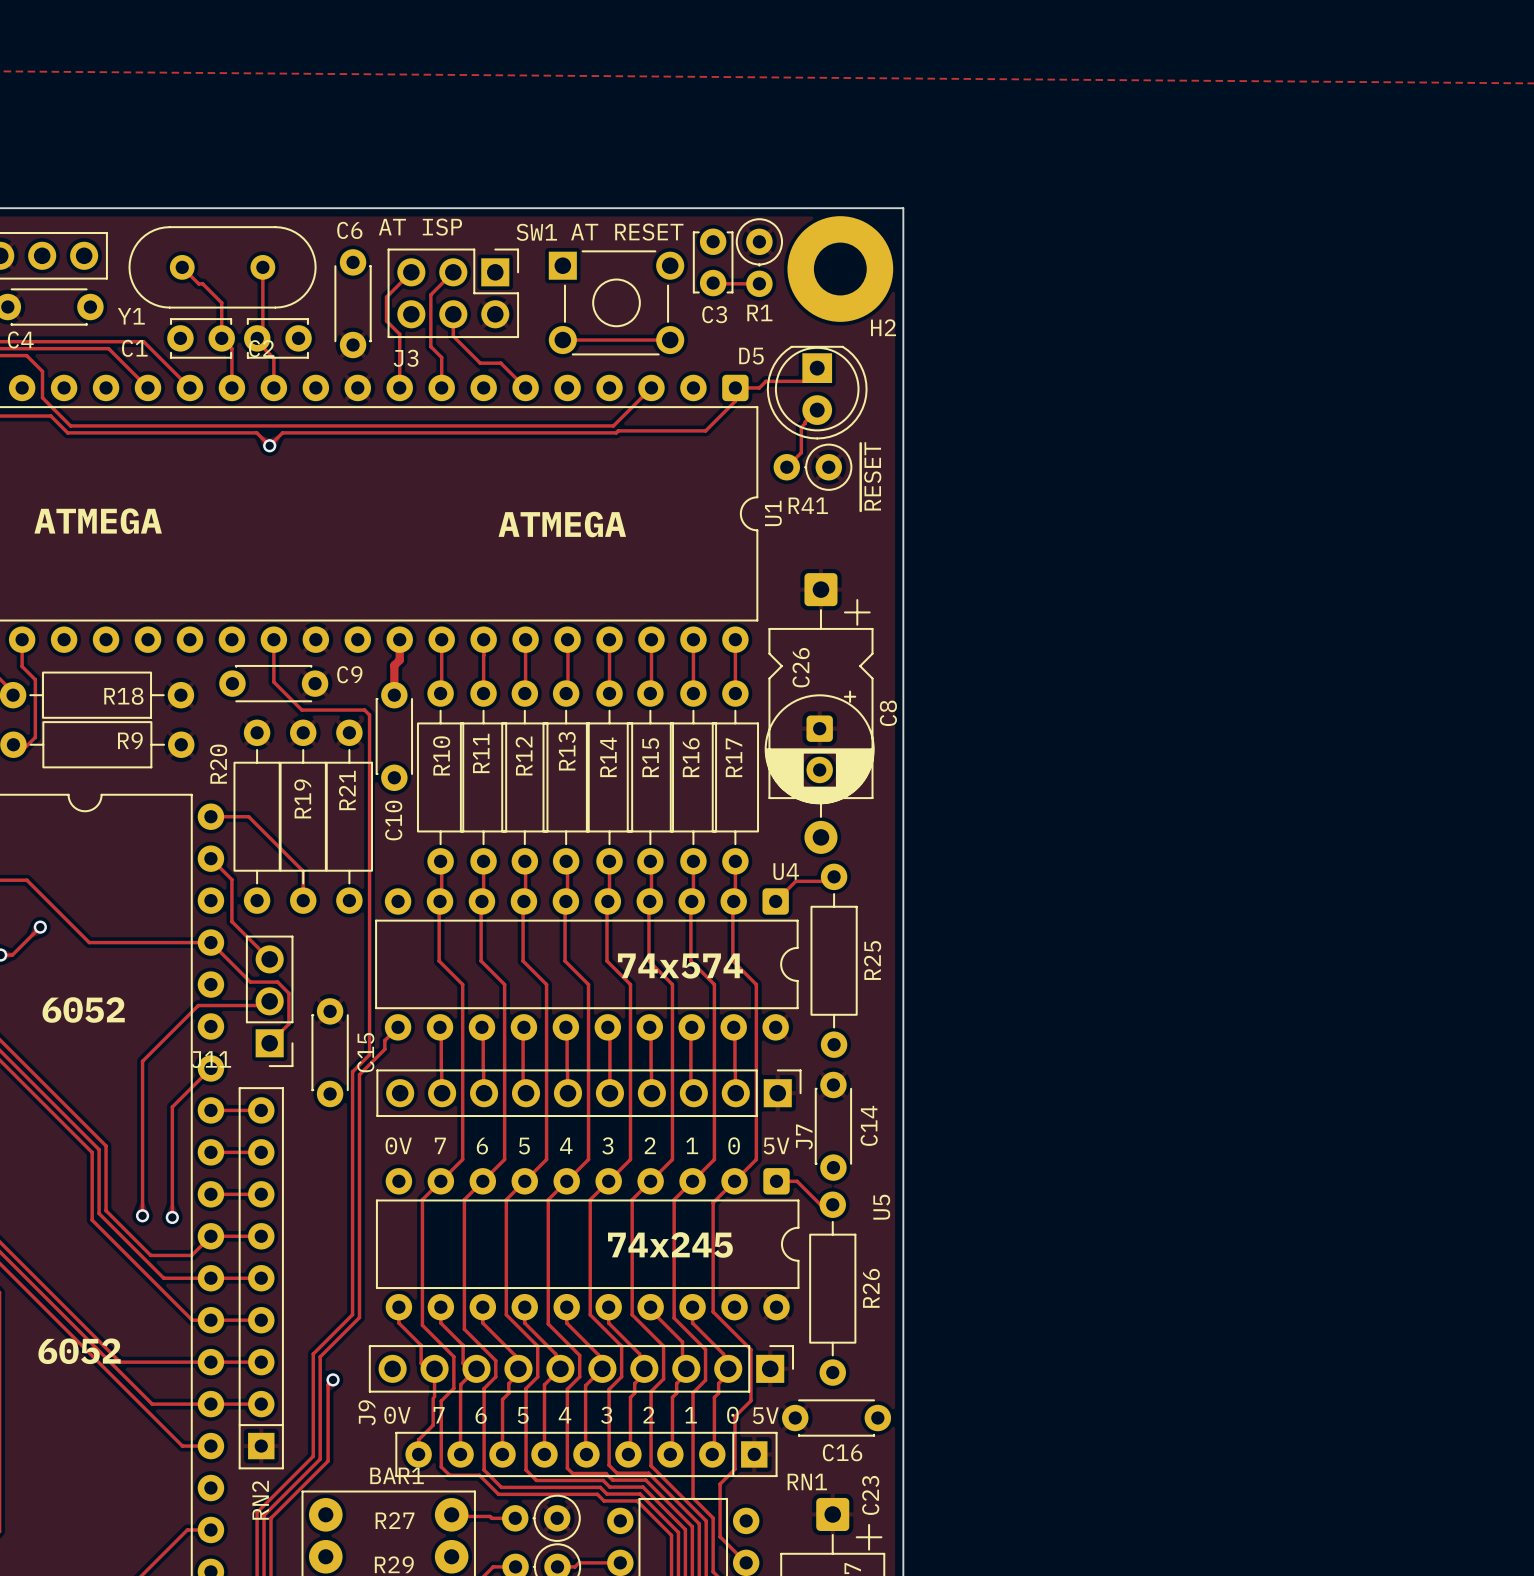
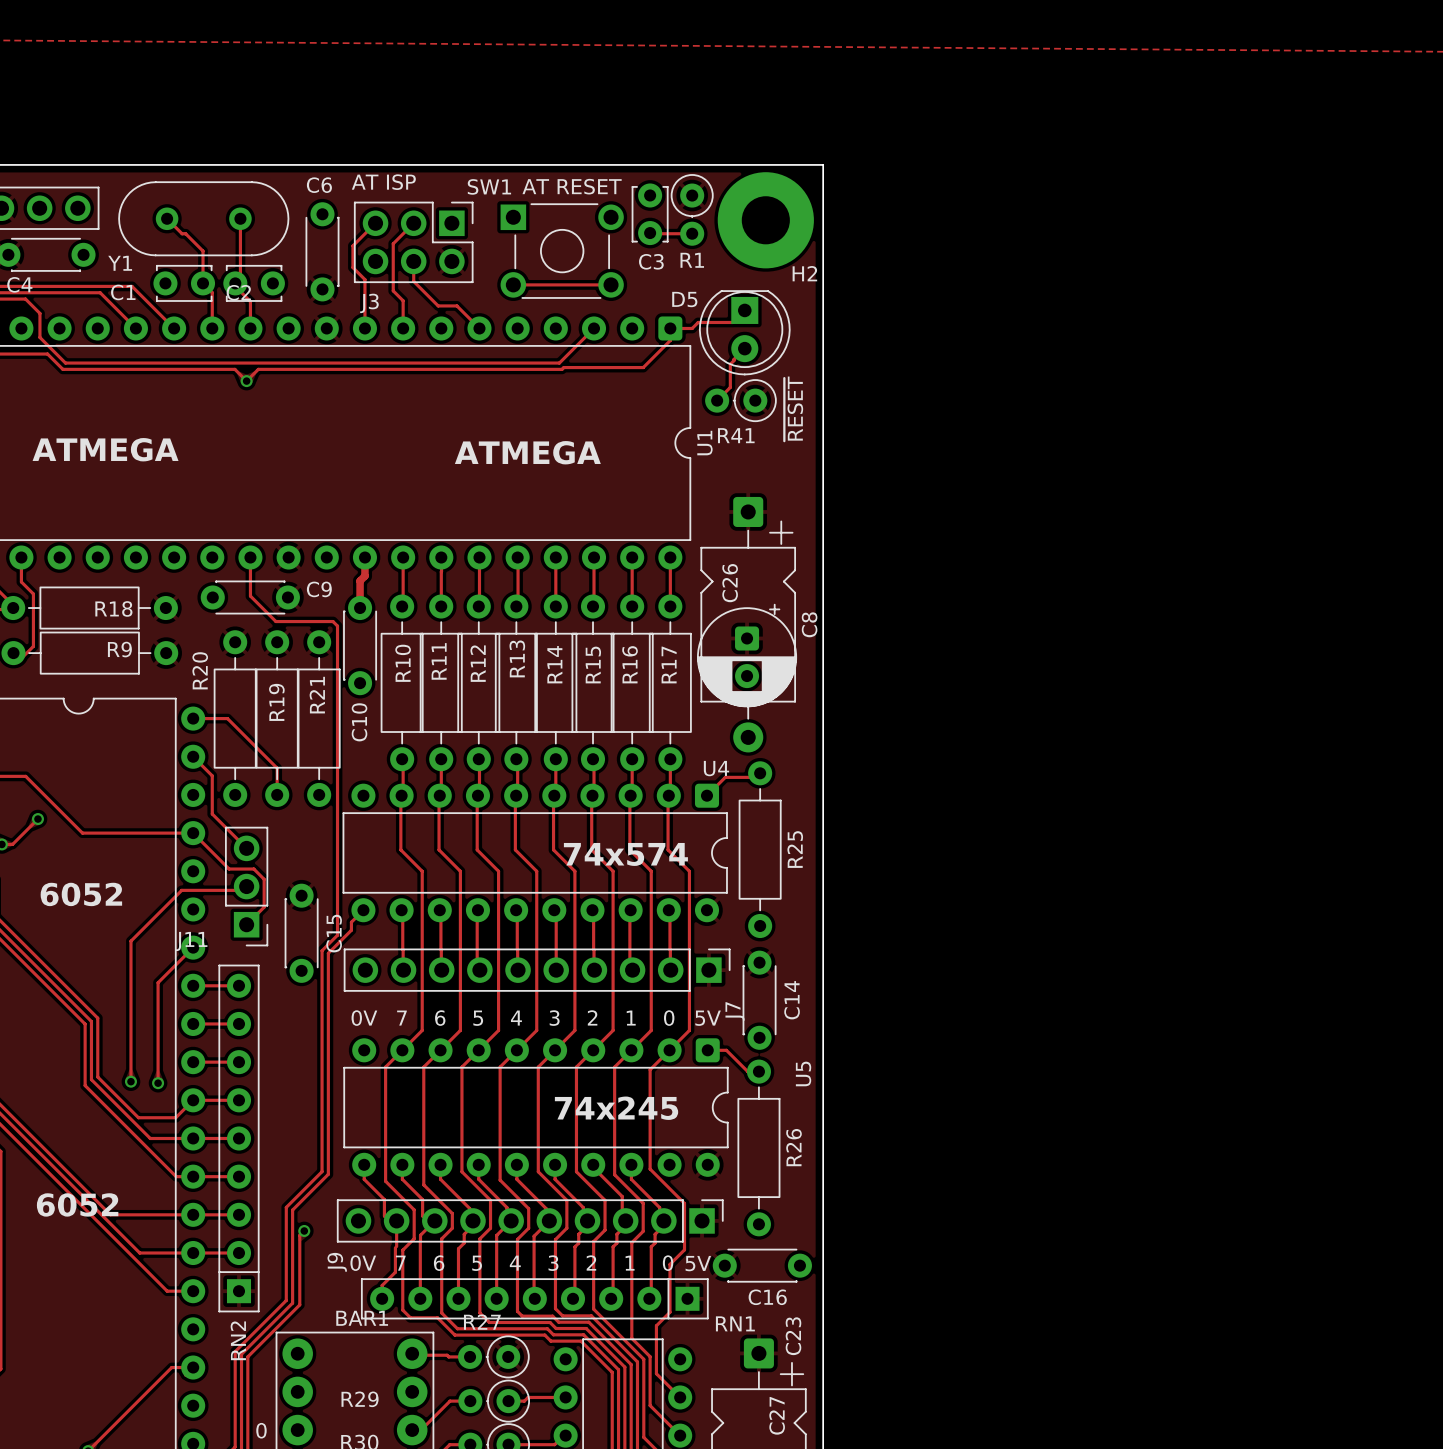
R27 name position: R27 (395, 1520) -> R27 (482, 1322)

